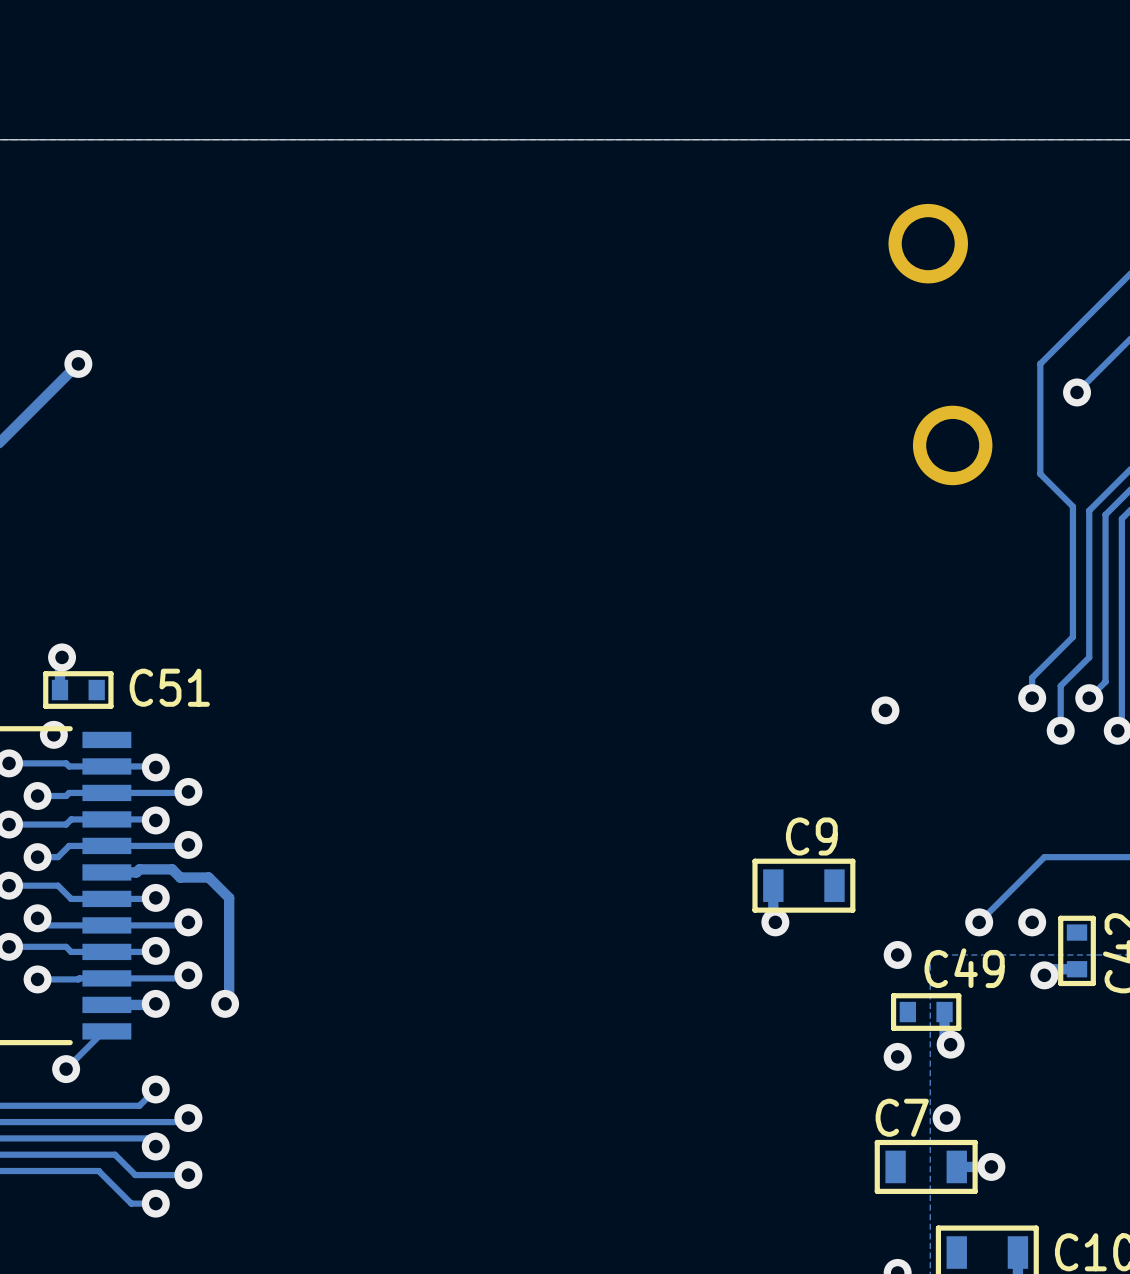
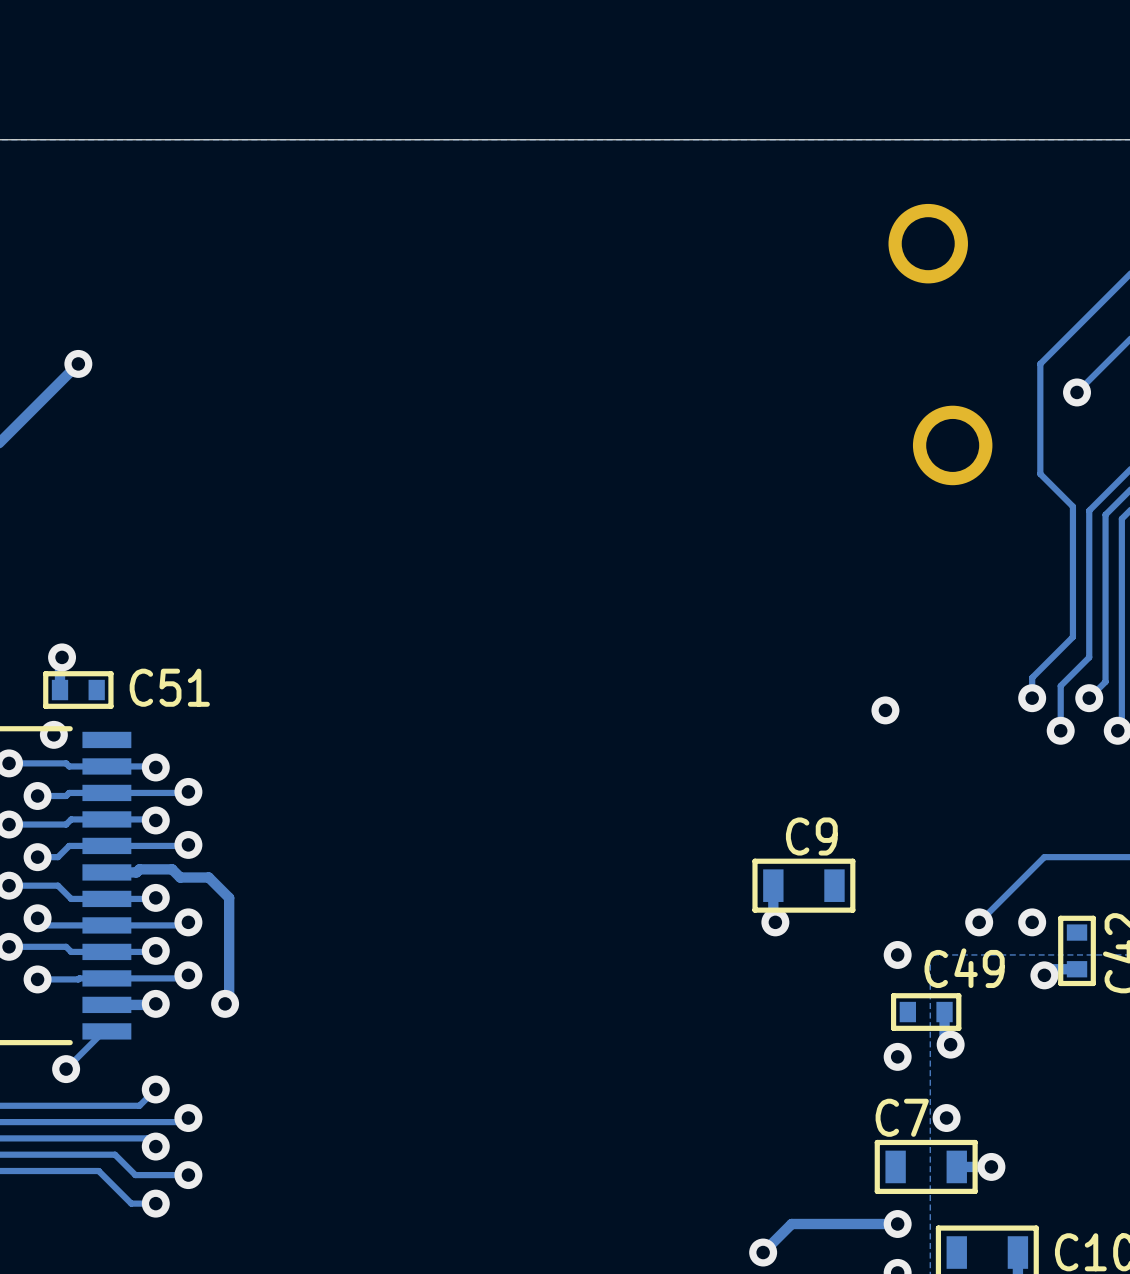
track: none -> (897, 1224) (791, 1224) (763, 1252)
via: none -> (897, 1224)
via: none -> (763, 1252)

